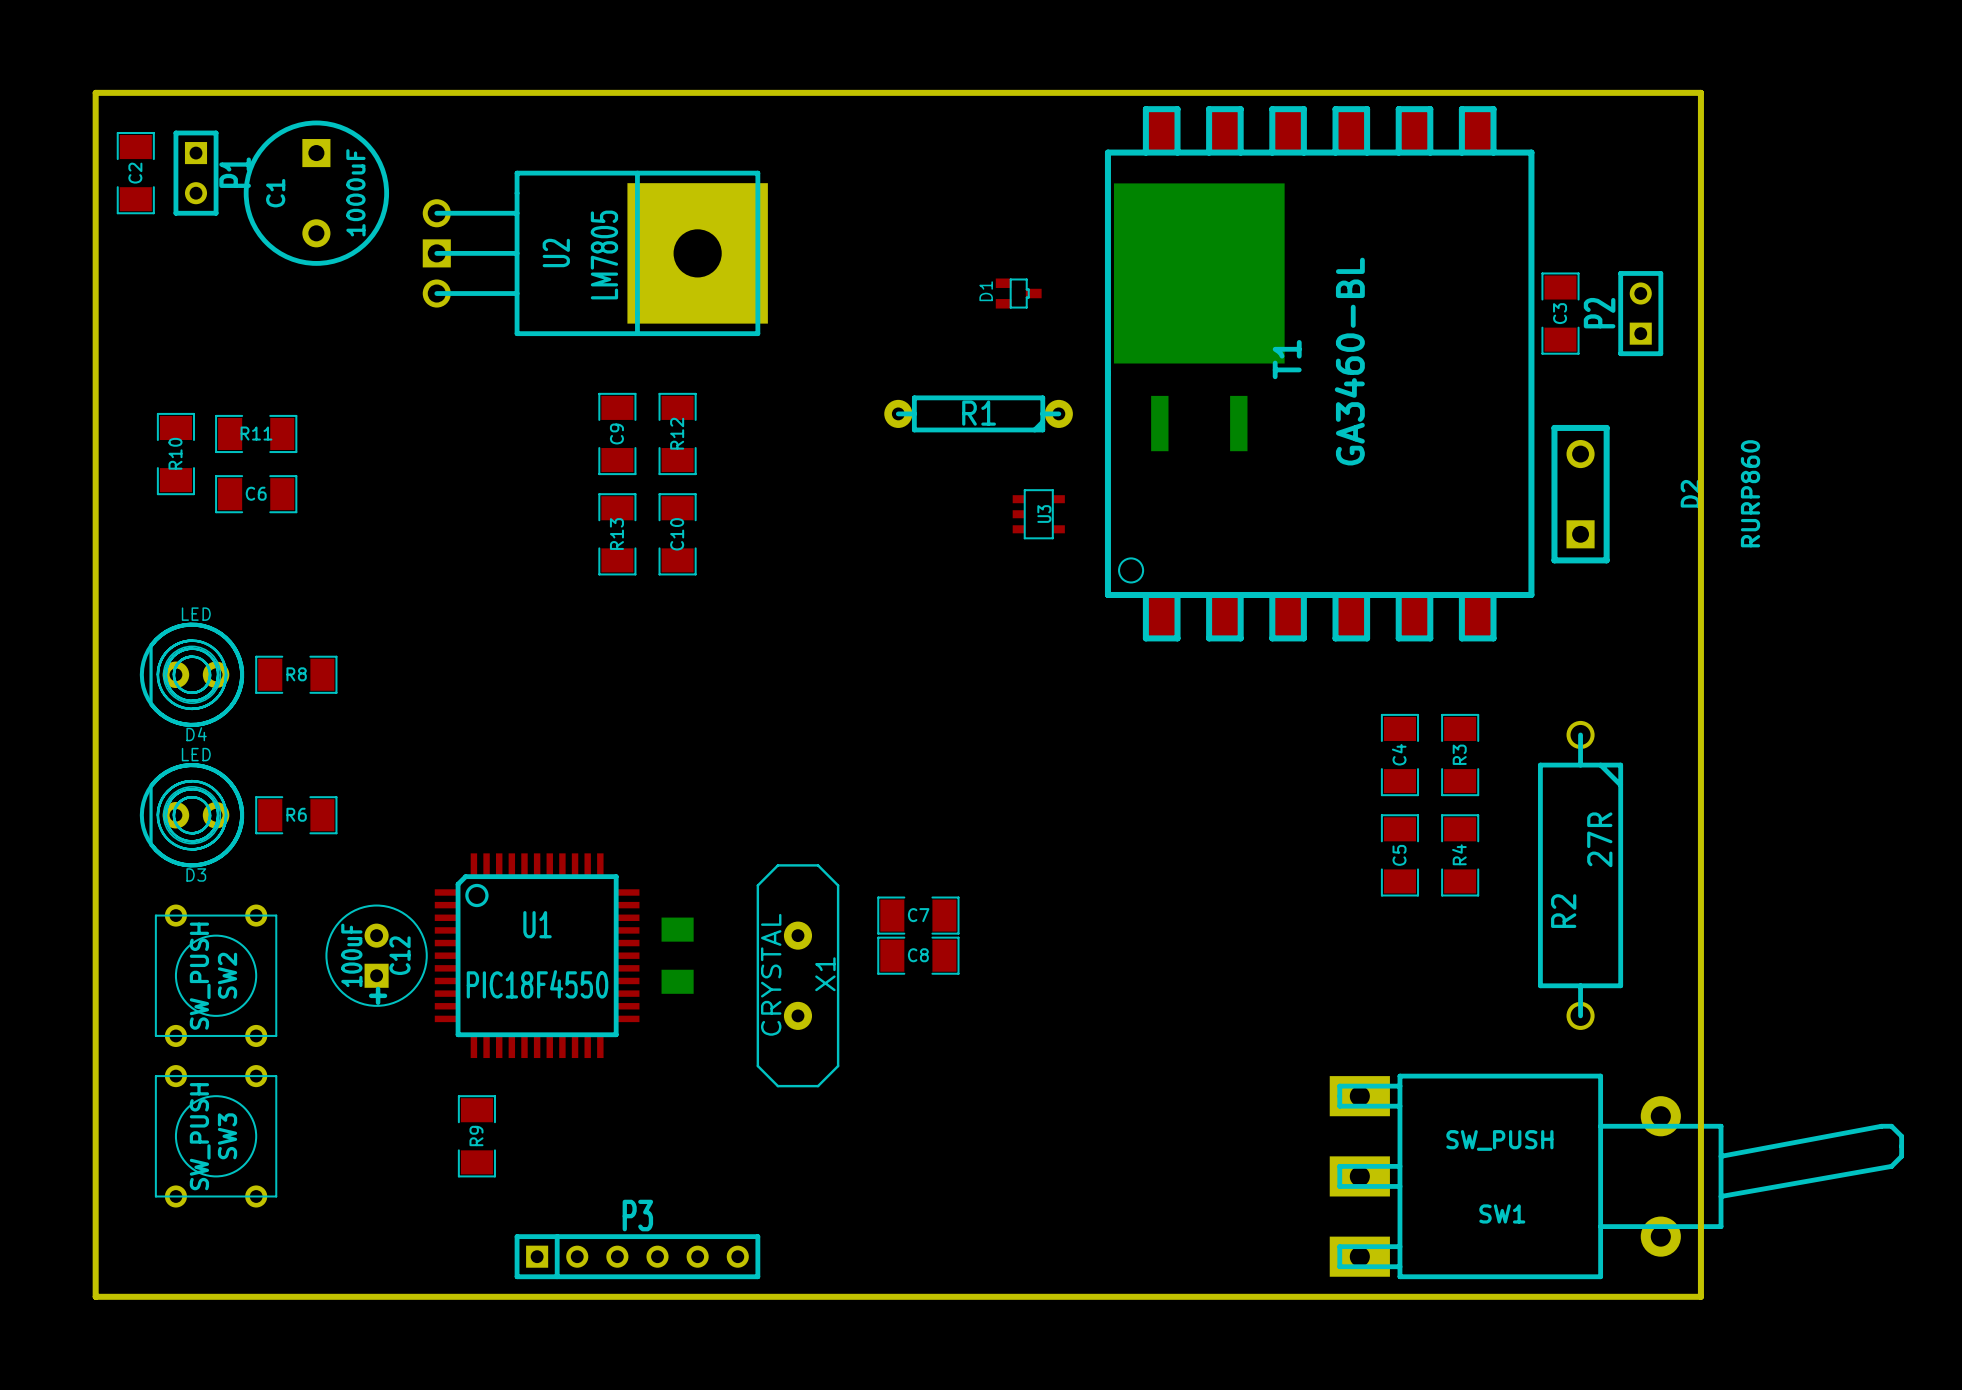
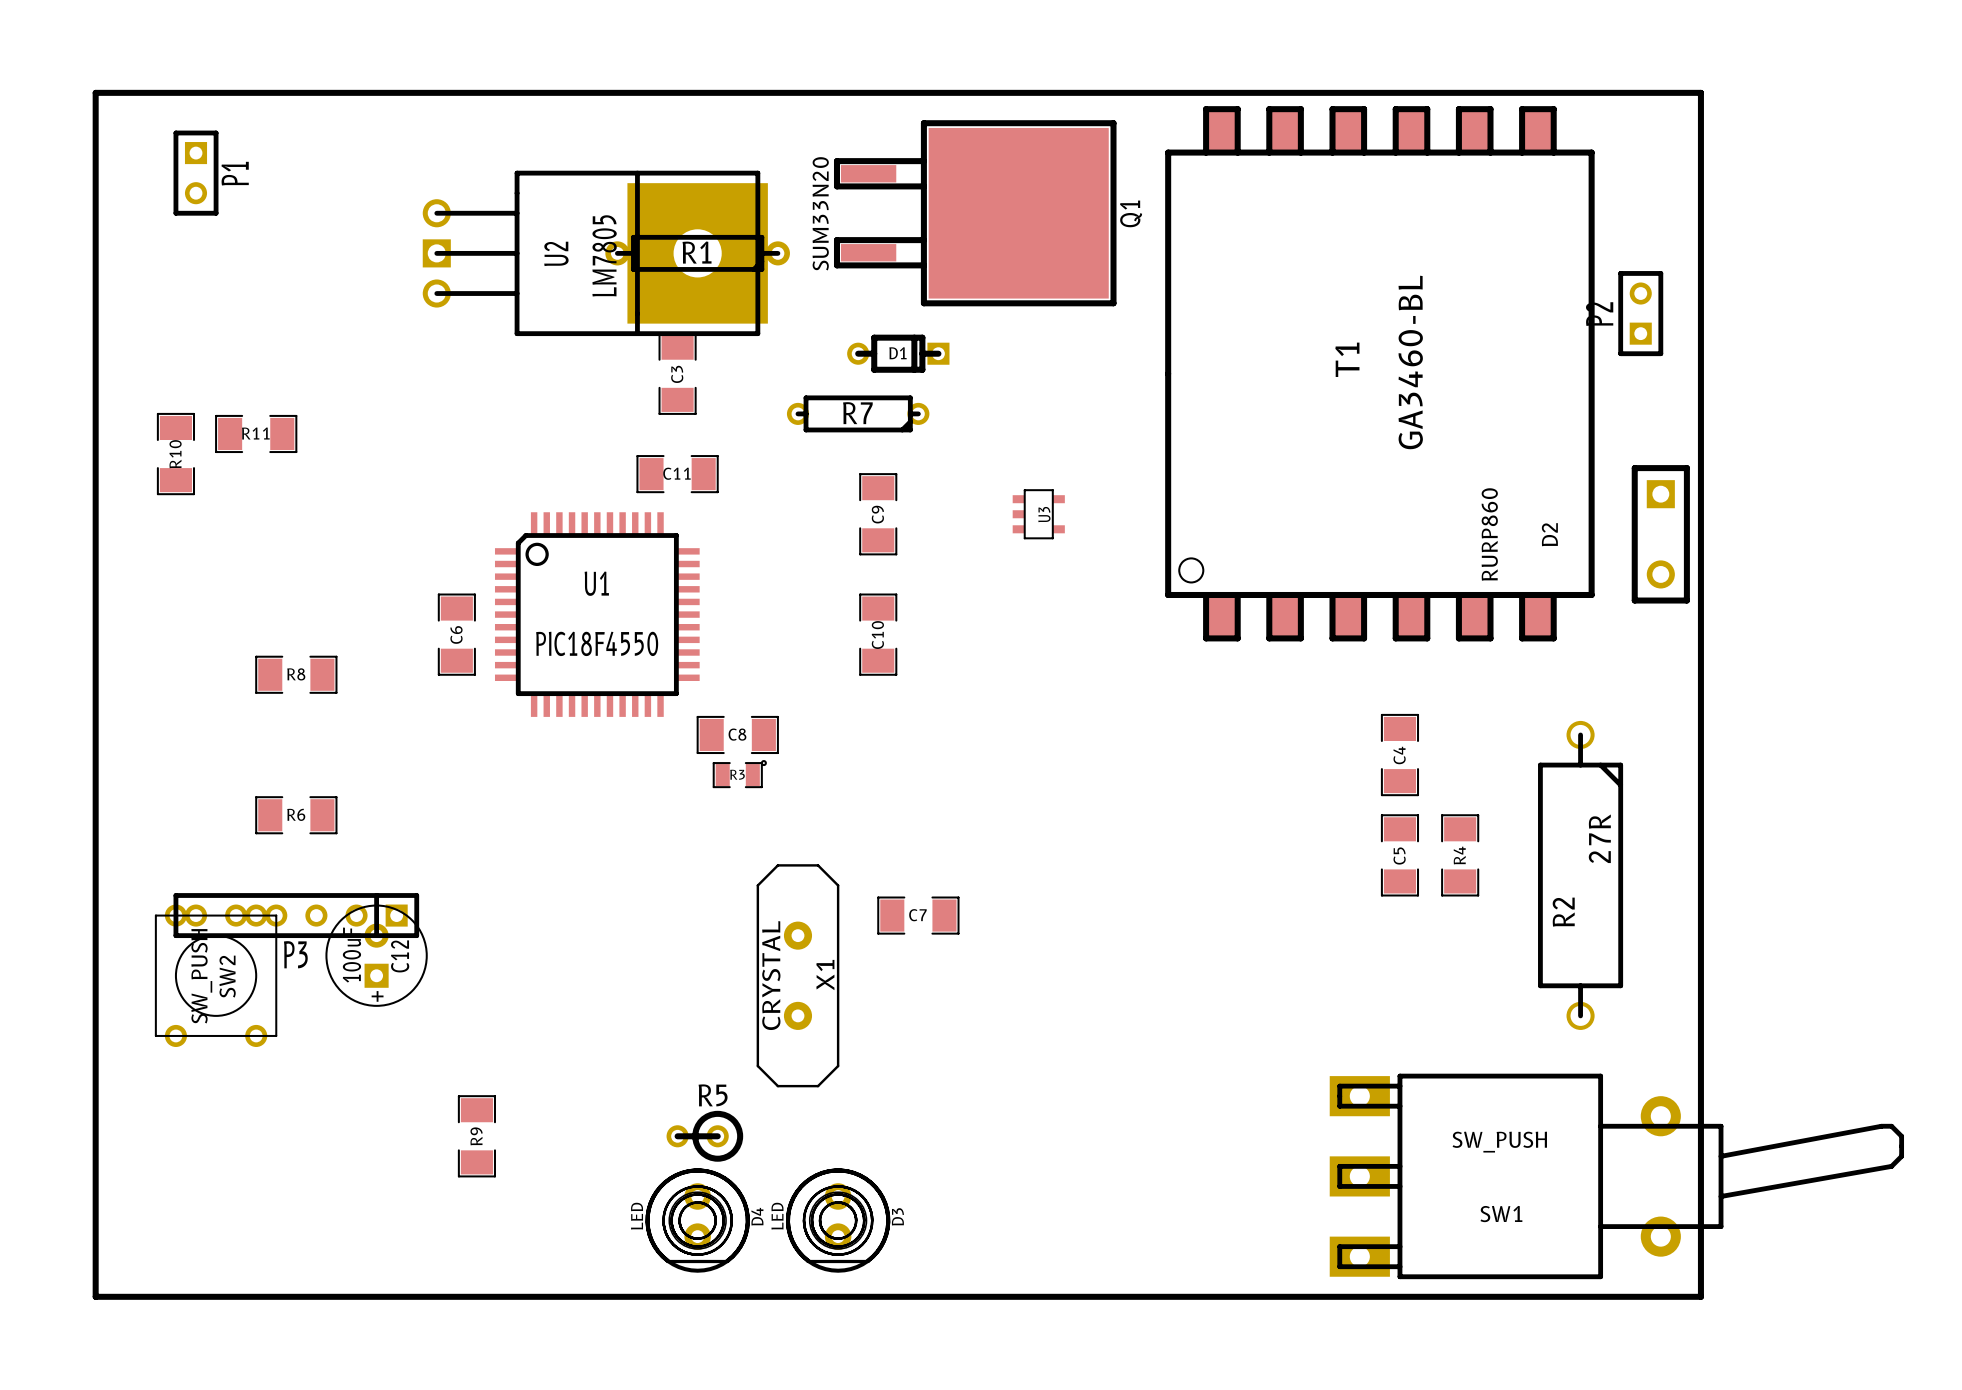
C2: (135, 173) -> none
C1: 1000uF (316, 193) -> none
D1 footprint: [995, 278, 1042, 309] -> [847, 334, 950, 373]
D1 name position: D1 (986, 291) -> D1 (897, 353)
C3 position: (1560, 313) -> (677, 373)
Q1 side: bottom (1199, 317) -> top (975, 213)
T1 position: (1319, 373) -> (1379, 373)
R1 footprint: [884, 395, 1073, 433] -> [605, 234, 790, 272]
R7: none -> (858, 413)
C9 position: (617, 433) -> (878, 514)
R12: (677, 433) -> none
C11: none -> (677, 474)
C6 rotation: 0° (256, 494) -> 90° clockwise (456, 634)
C6 position: (256, 494) -> (456, 634)
D2 rotation: 0° (1580, 494) -> 180° (1660, 534)
D2 position: (1580, 494) -> (1660, 534)
R13: (617, 534) -> none
C10 position: (677, 534) -> (878, 634)
D4 rotation: 0° (191, 674) -> 90° counterclockwise (697, 1220)
D4 position: (191, 674) -> (697, 1220)
R3 footprint: [1441, 713, 1480, 797] -> [712, 760, 767, 789]
D3 rotation: 0° (191, 815) -> 90° counterclockwise (838, 1220)
D3 position: (191, 815) -> (838, 1220)
U1 position: (537, 955) -> (597, 614)
part: (677, 955) -> none
C8 position: (918, 955) -> (737, 734)
SW3: SW_PUSH (216, 1136) -> none
R5: none -> (704, 1136)
P3 rotation: 0° (637, 1256) -> 180° (296, 915)
P3 position: (637, 1256) -> (296, 915)

